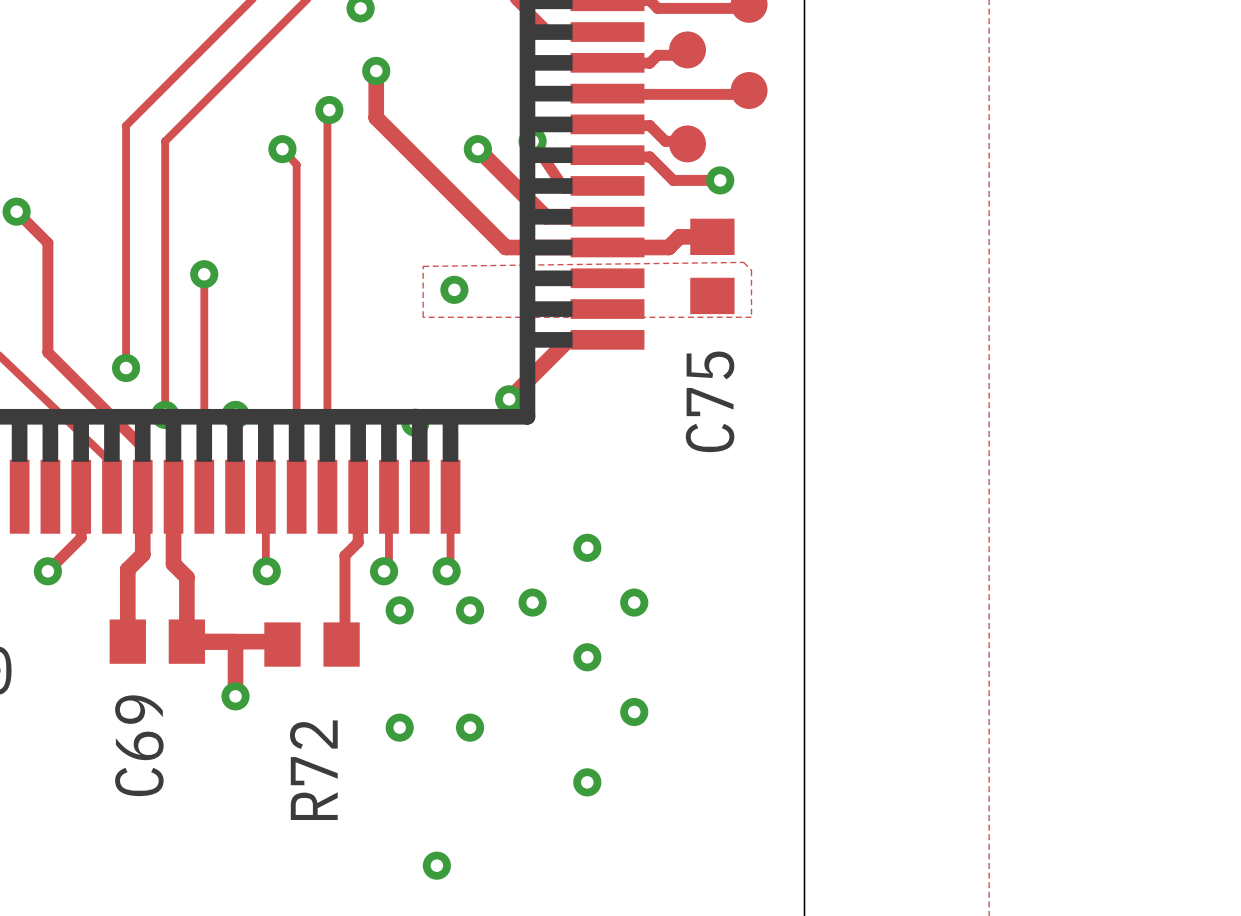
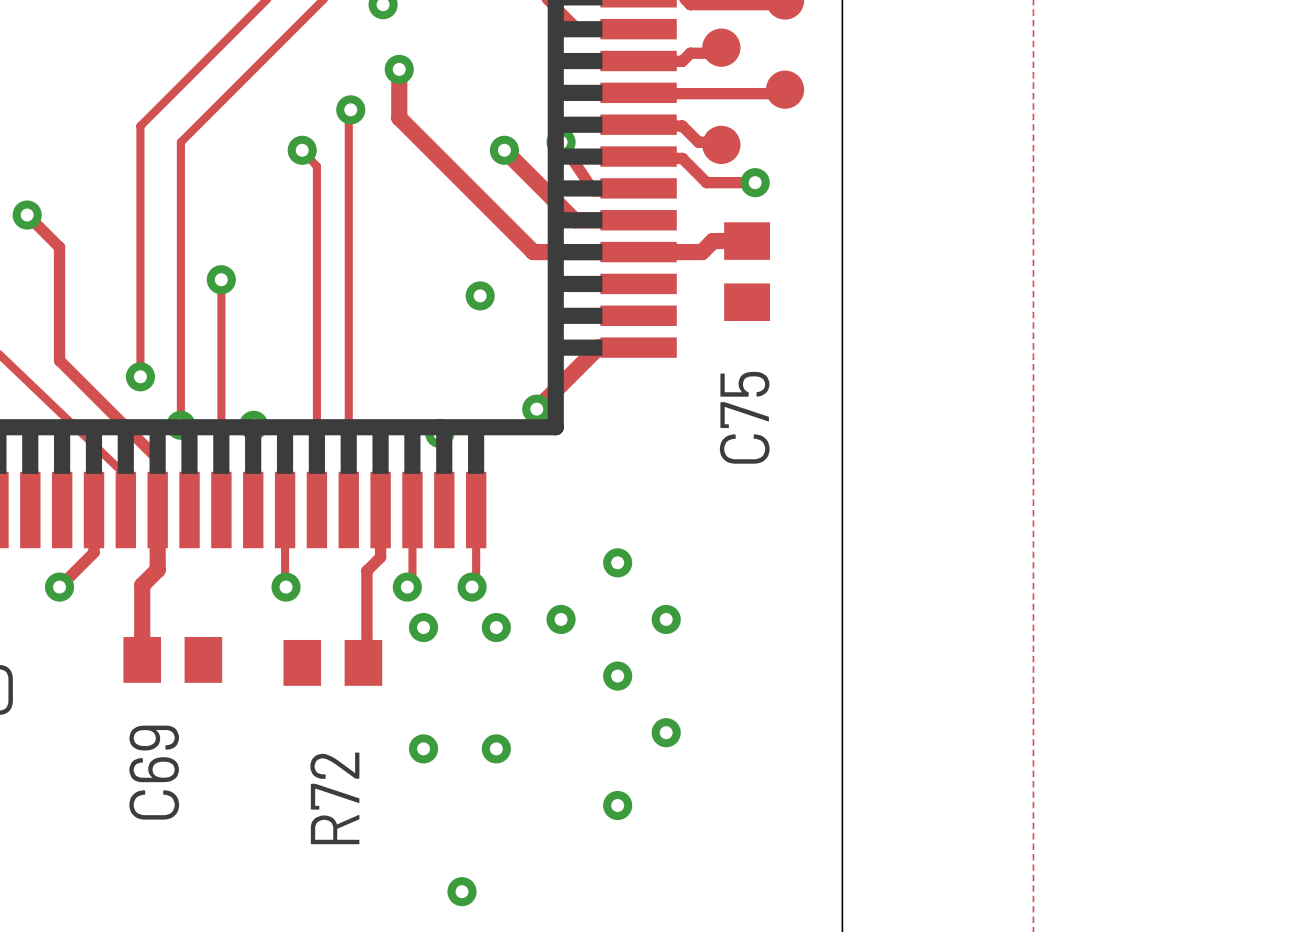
zone outline: (743, 262) (751, 270) (751, 317) (423, 317) (423, 266) (743, 262) -> none
track: (173, 496) (173, 564) (186, 577) (186, 641) (282, 641) (282, 644) -> none
track: (235, 641) (235, 696) -> none
via: (235, 696) -> none

